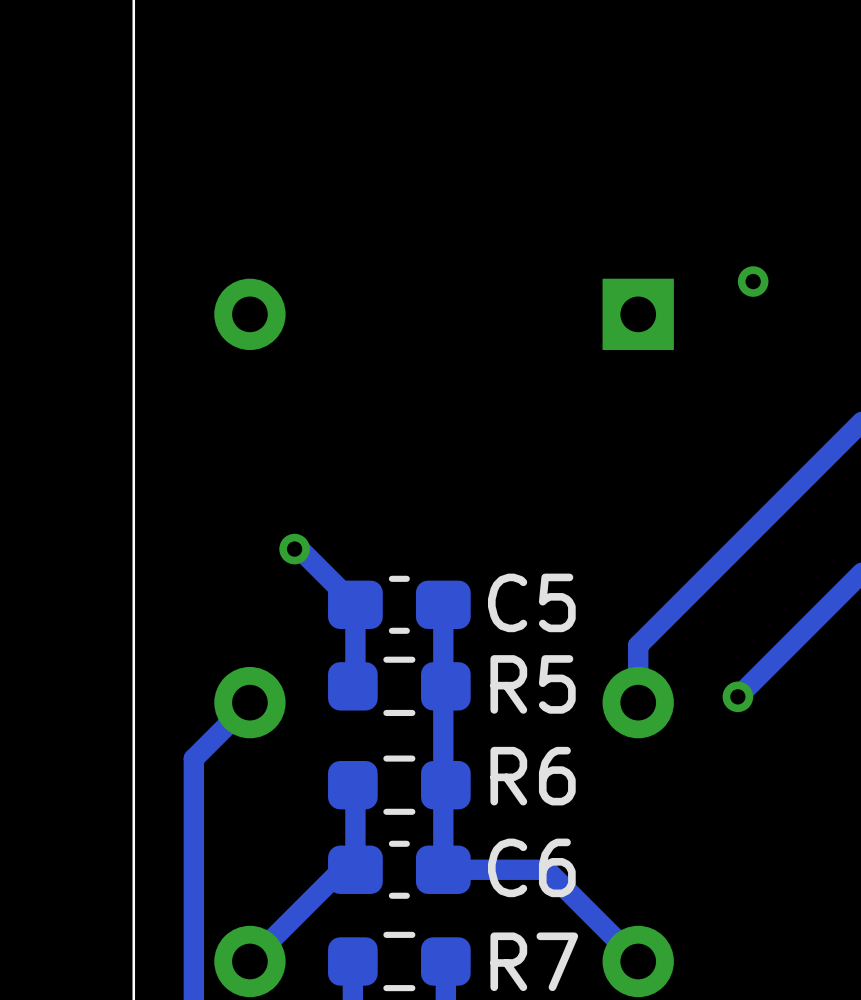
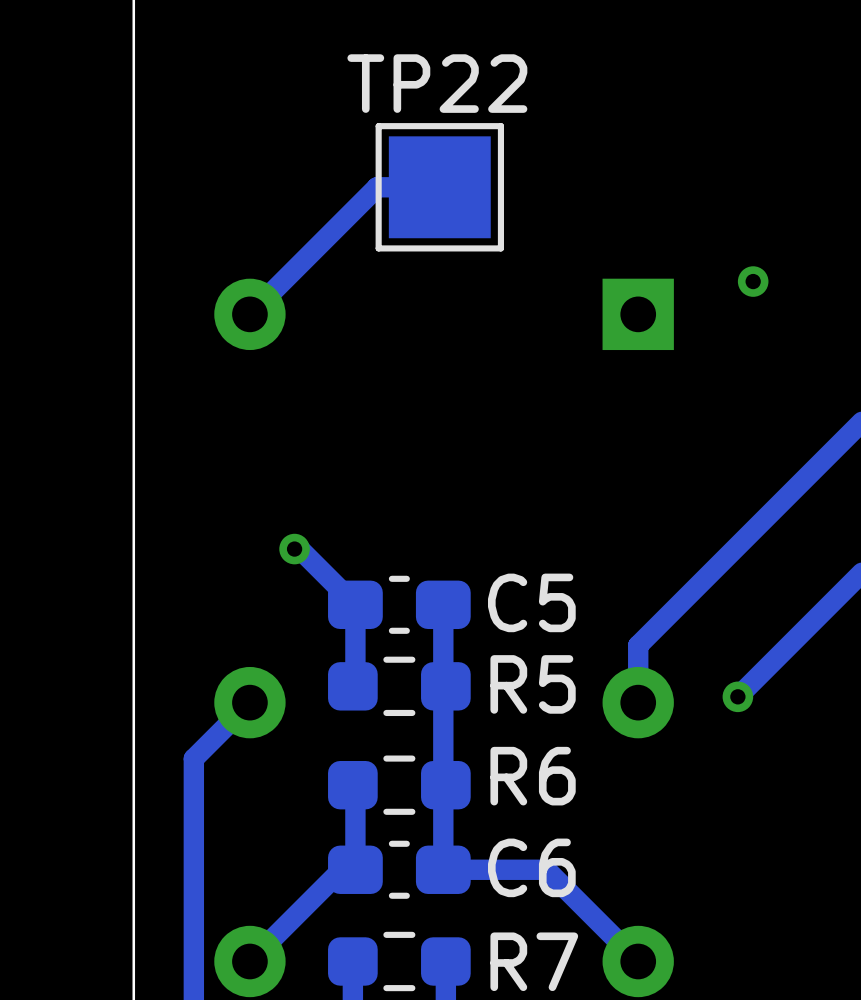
track: none -> (439, 187) (377, 187) (249, 314)
TP22: none -> (439, 187)

